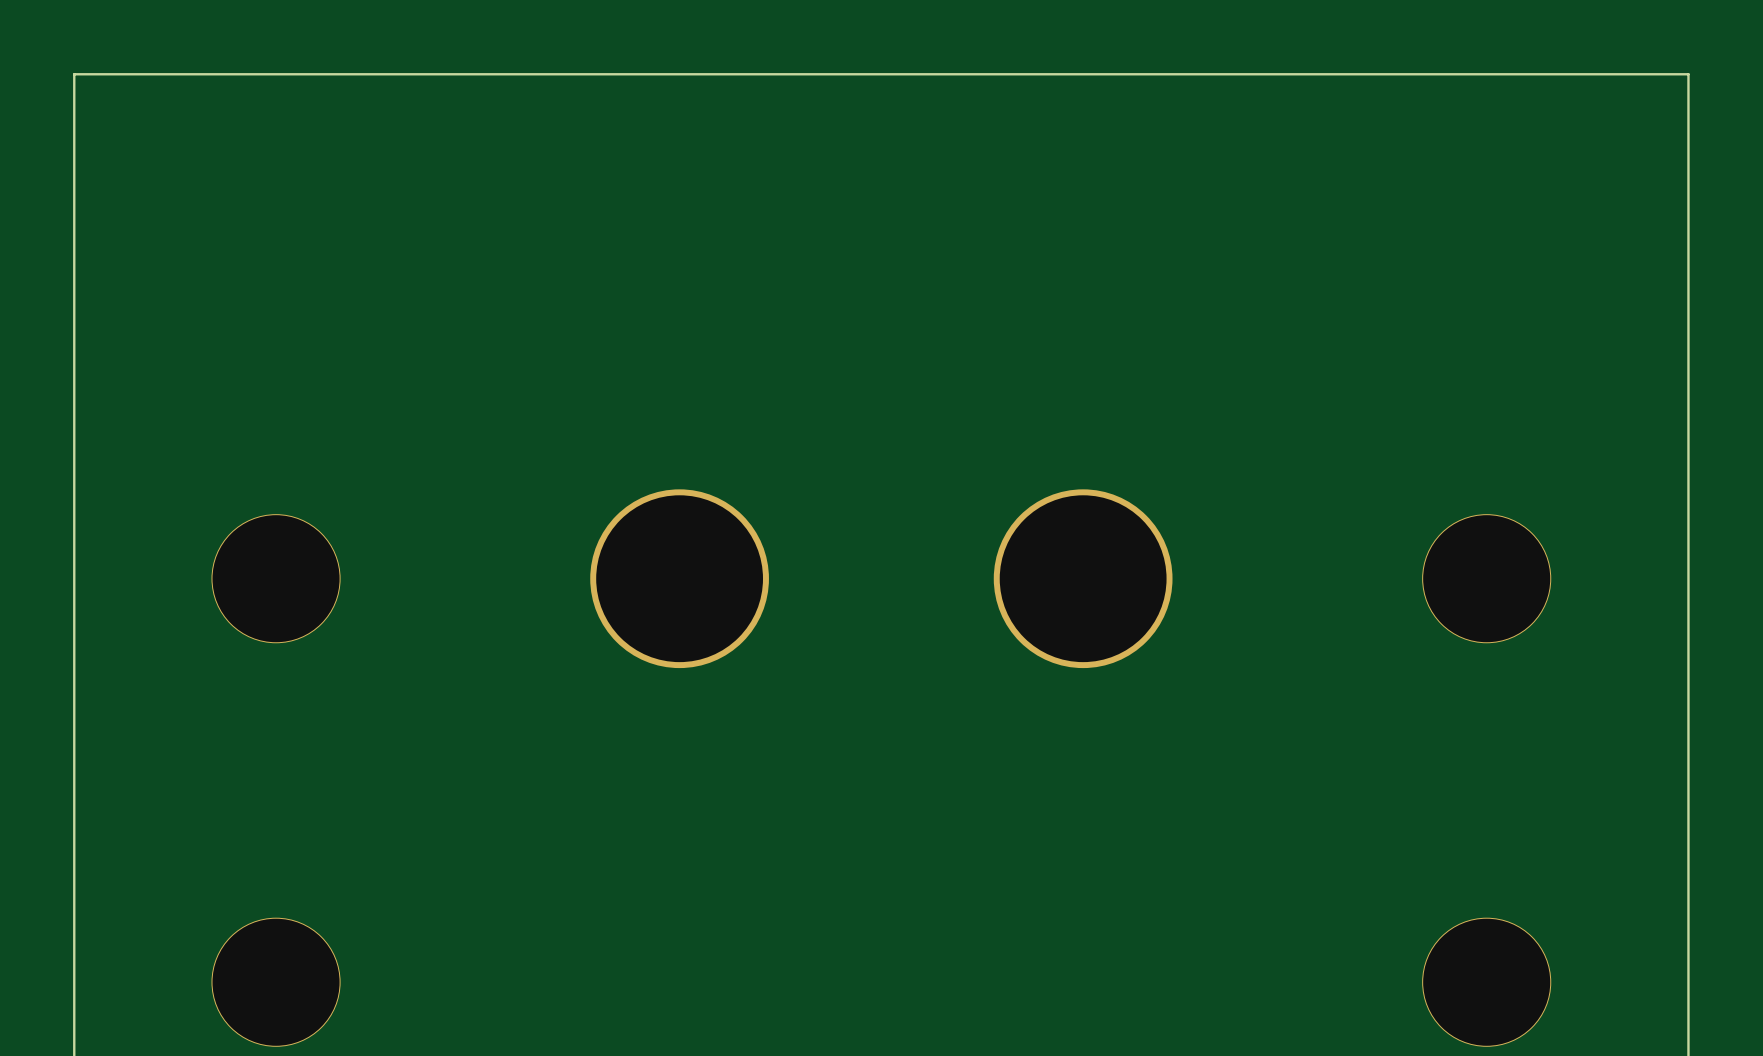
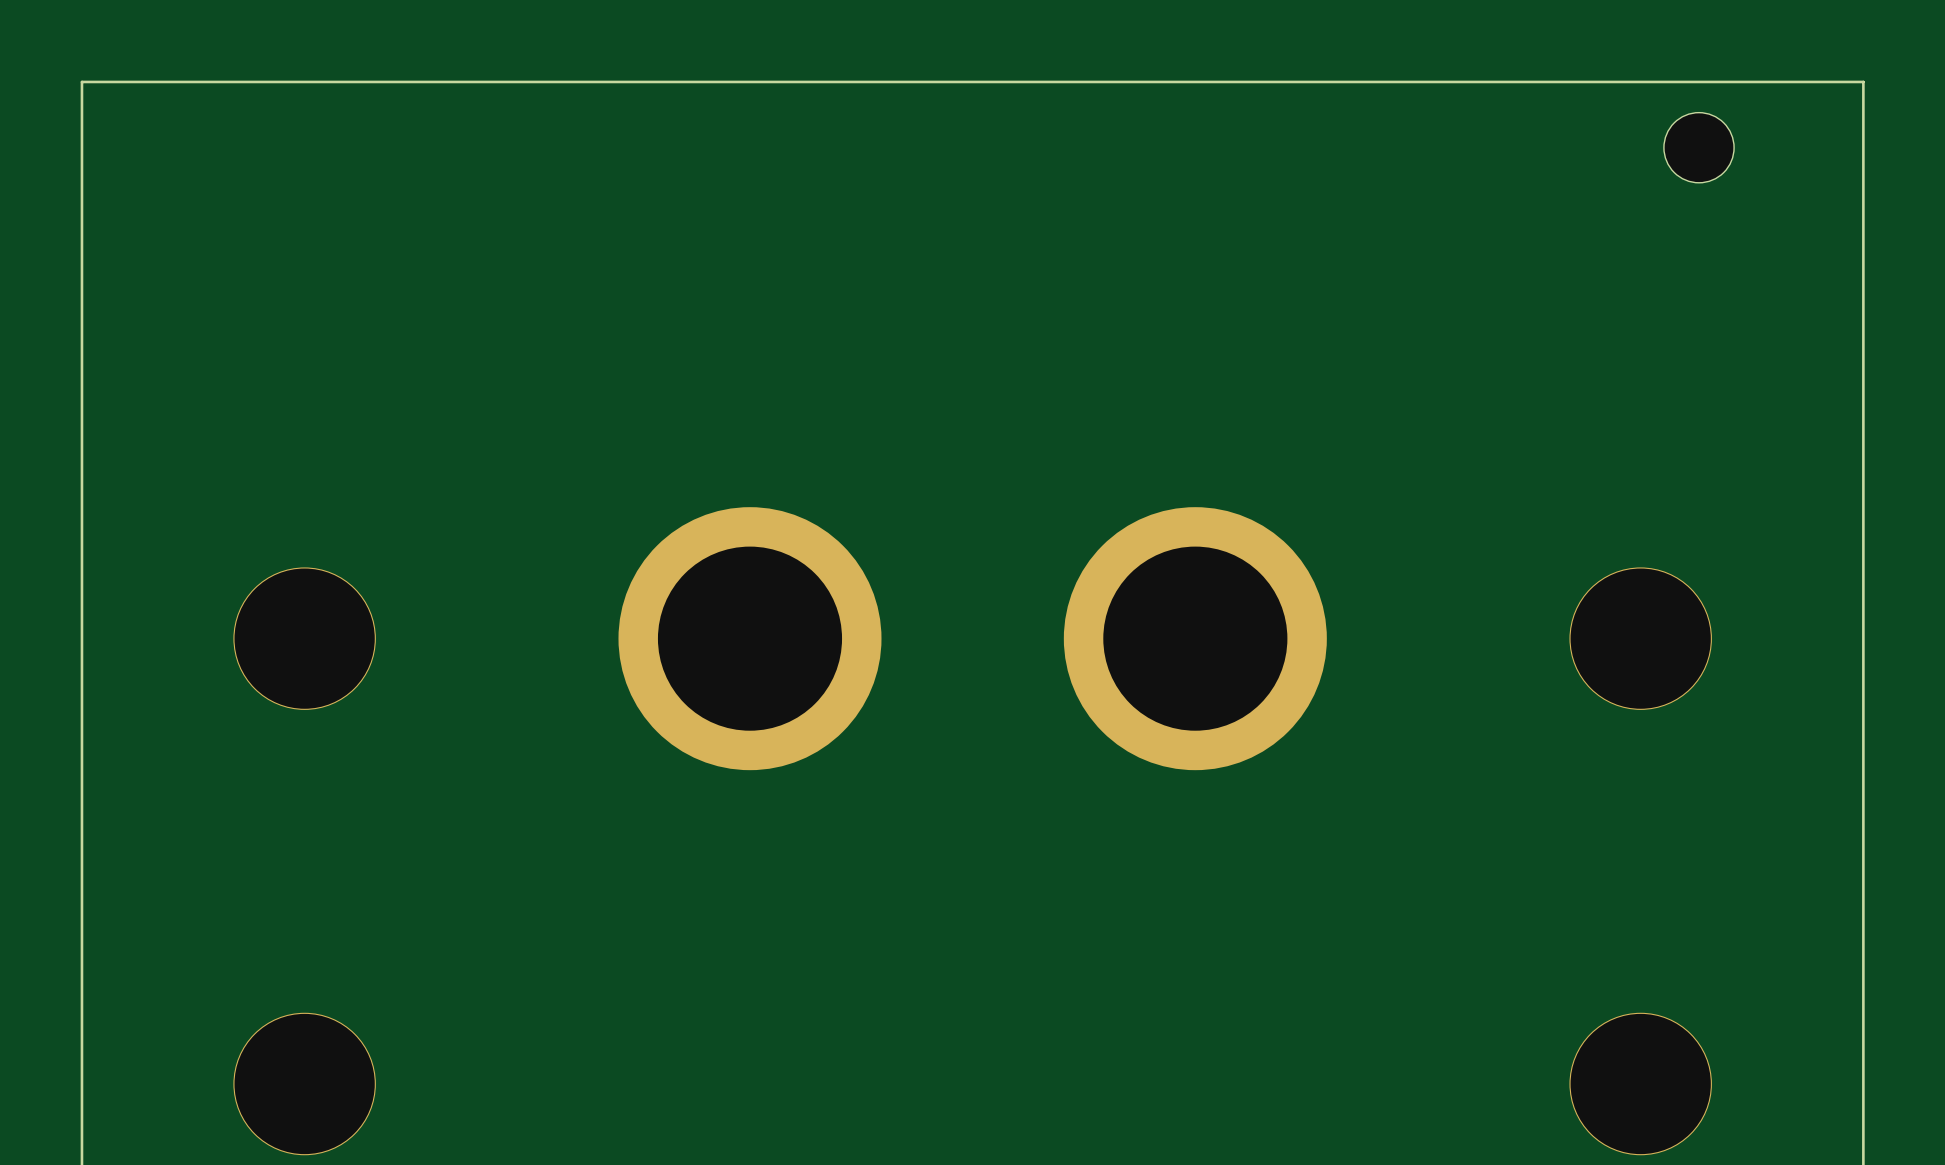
part: none -> (1698, 147)
part footprint: [590, 489, 769, 669] -> [618, 507, 882, 771]
part footprint: [993, 489, 1173, 669] -> [1063, 507, 1327, 771]

